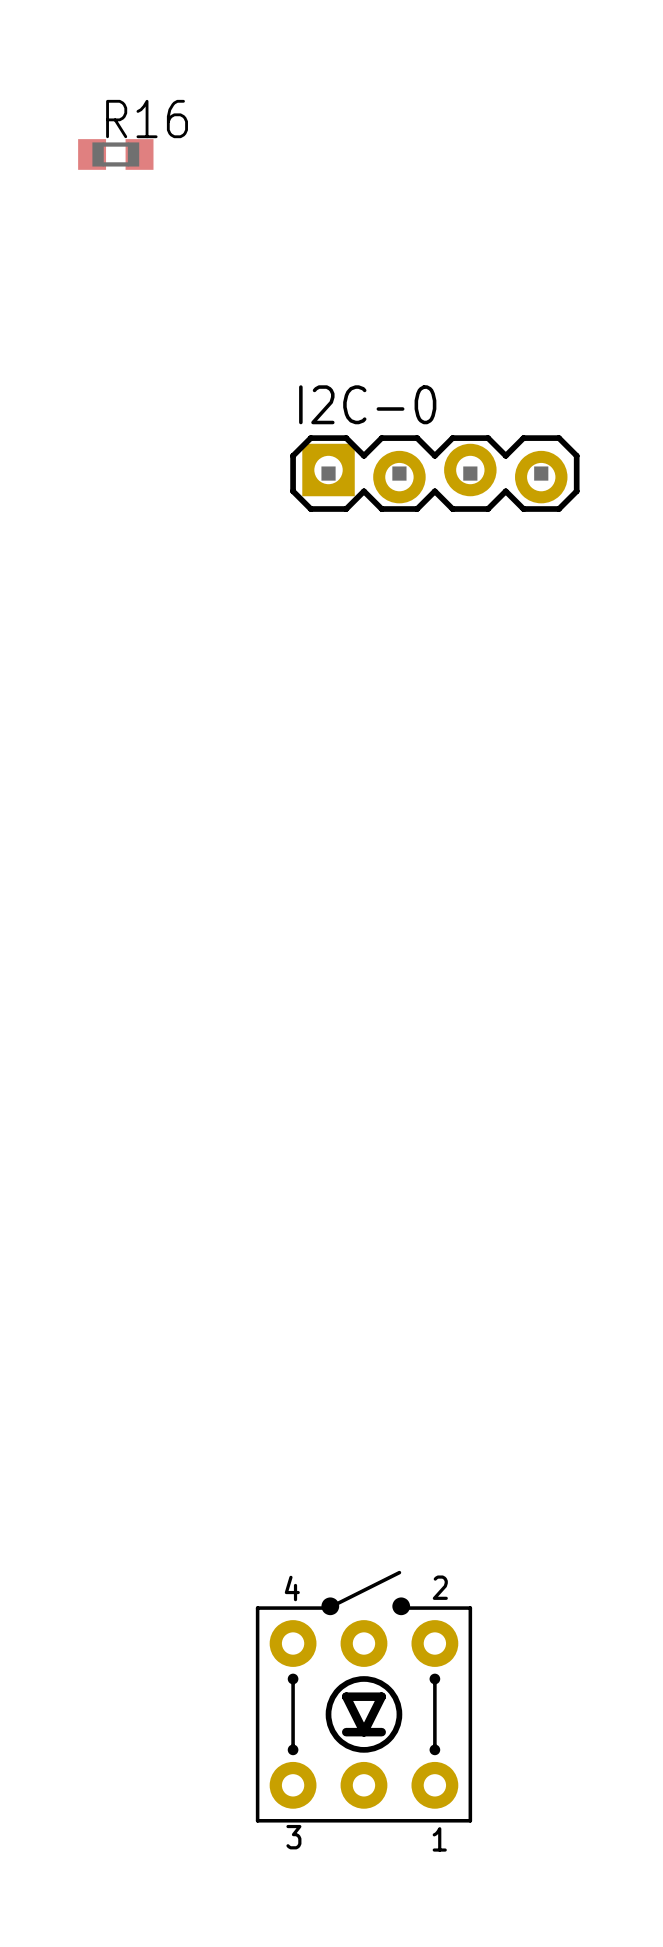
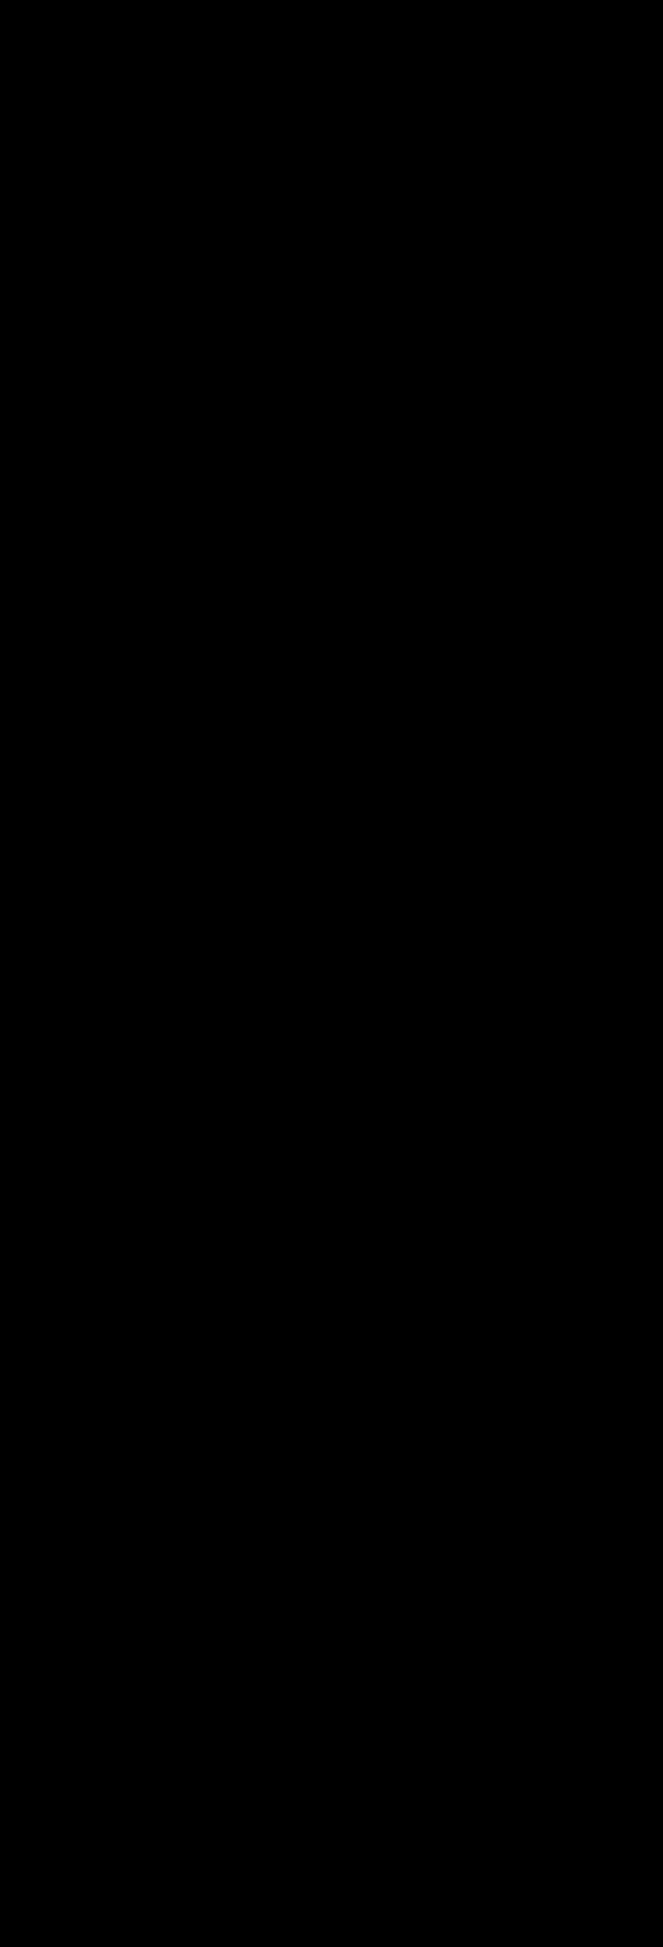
R16: (115, 154) -> none
I2C-0: (434, 473) -> none
part: (363, 1696) -> none

